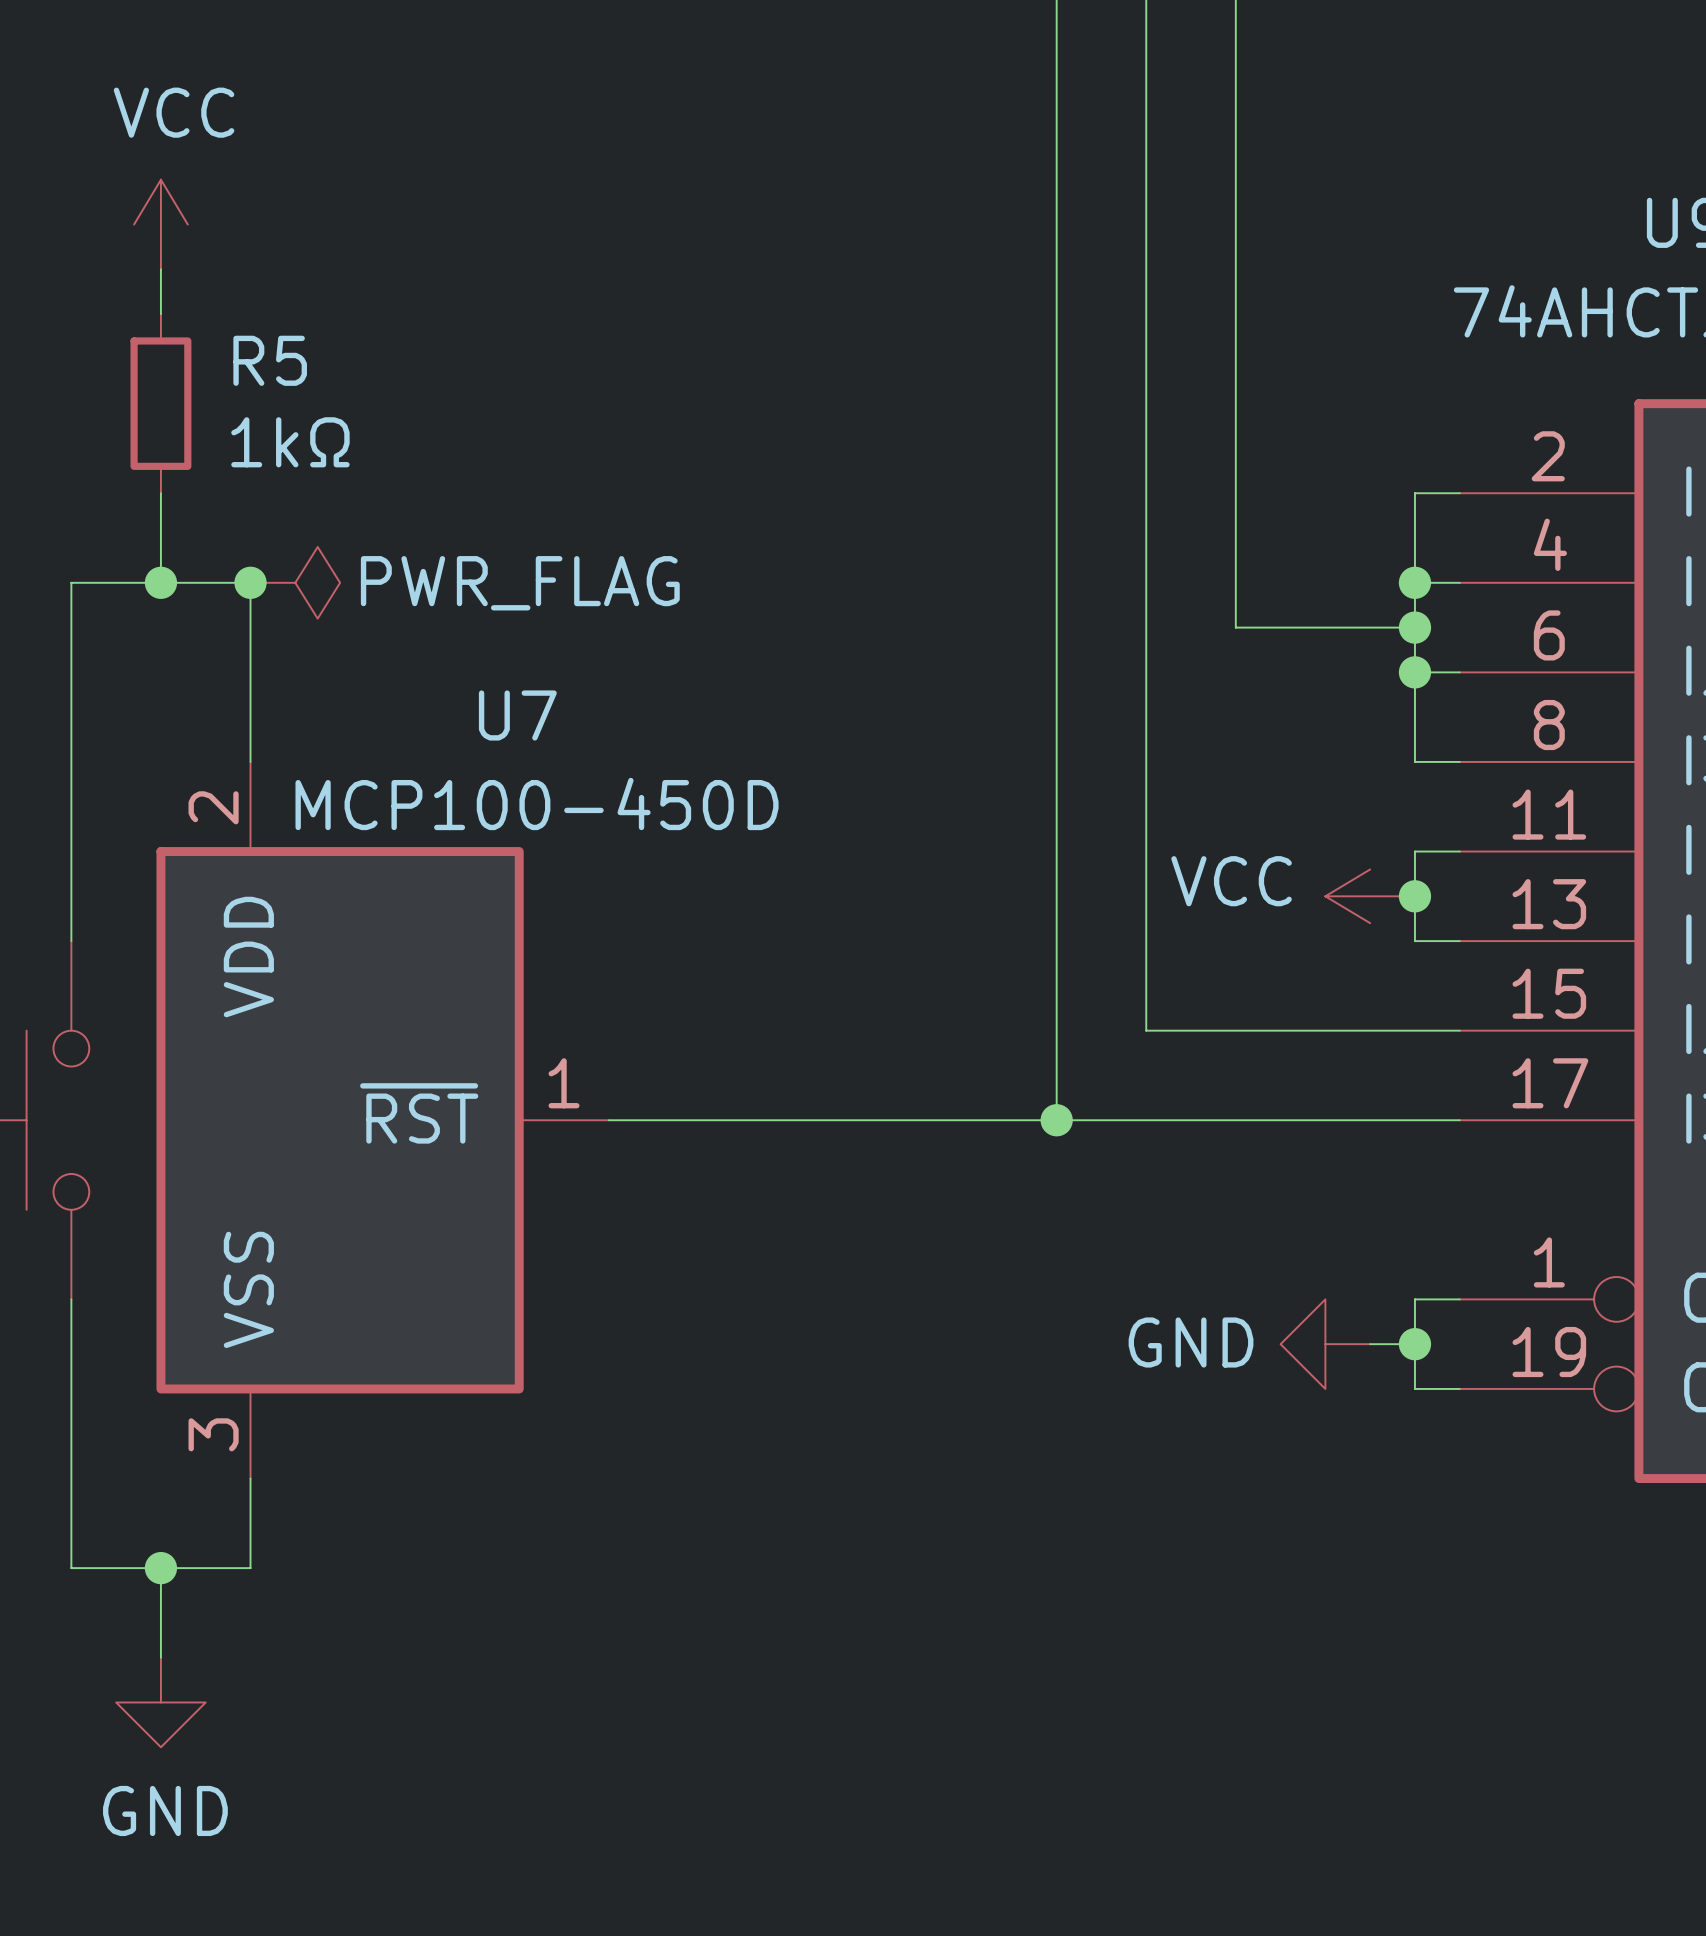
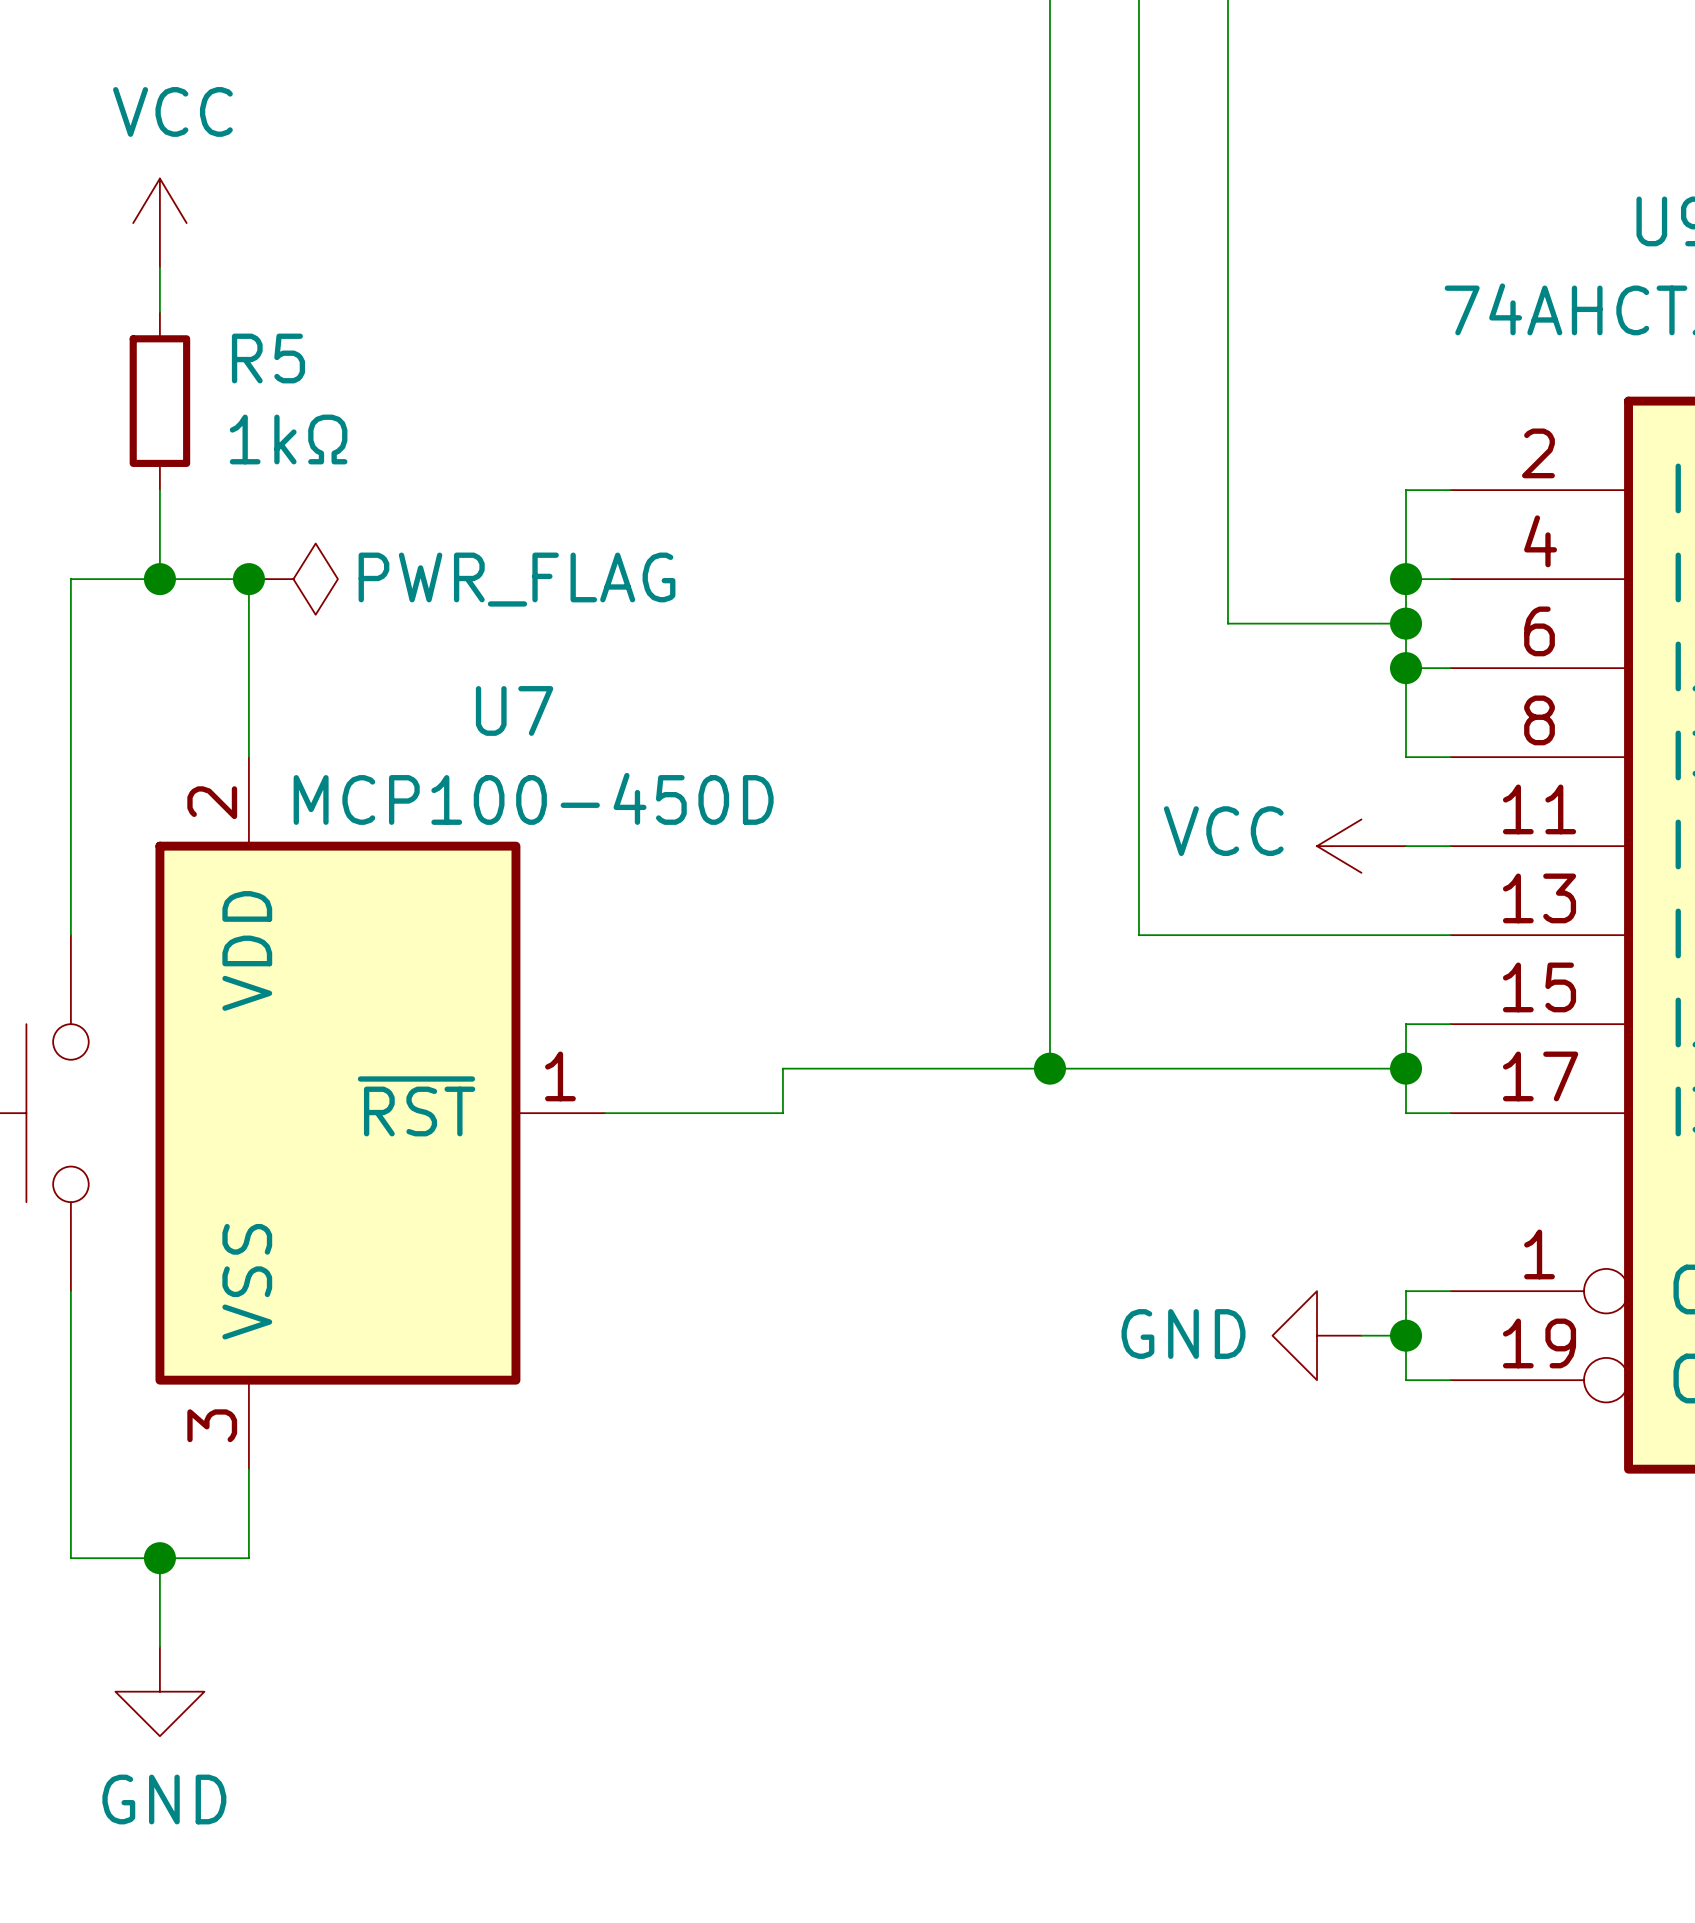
wire: (1414, 851) (1414, 941) -> (1406, 1024) (1406, 1113)
power symbol position: VCC (1370, 896) -> VCC (1361, 846)
junction position: (1414, 896) -> (1406, 1068)
wire: (1146, 941) (1146, 1030) (1414, 1030) -> (1138, 935) (1406, 935)
wire: (1056, 1075) (1056, 1120) -> none
wire: (787, 1120) (1414, 1120) -> (782, 1113) (782, 1068) (1406, 1068)
junction position: (1056, 1120) -> (1049, 1068)

